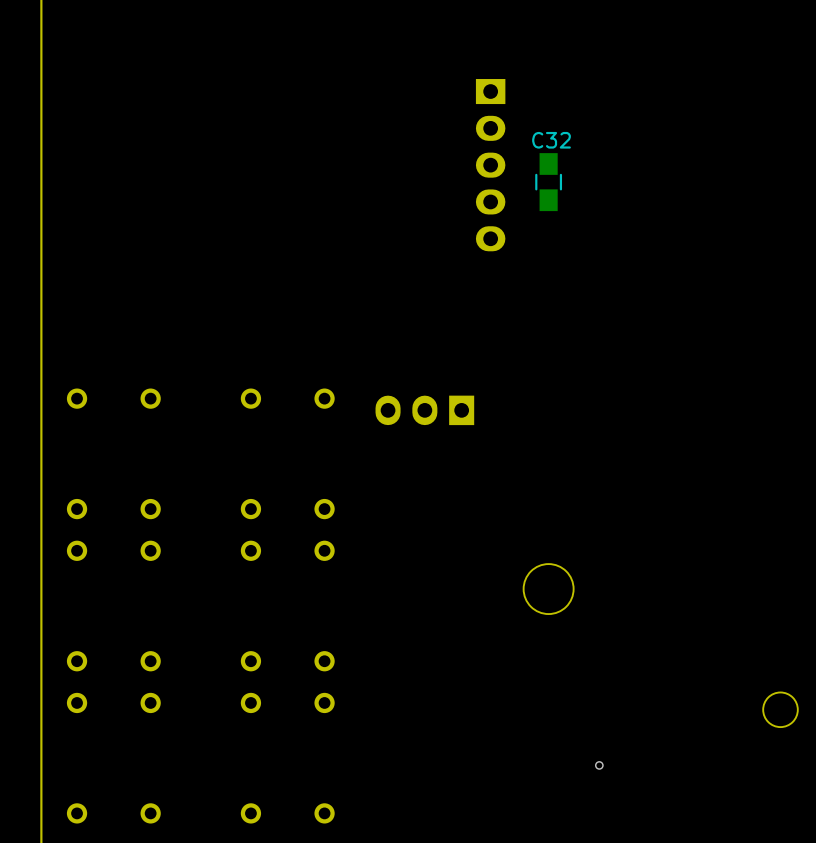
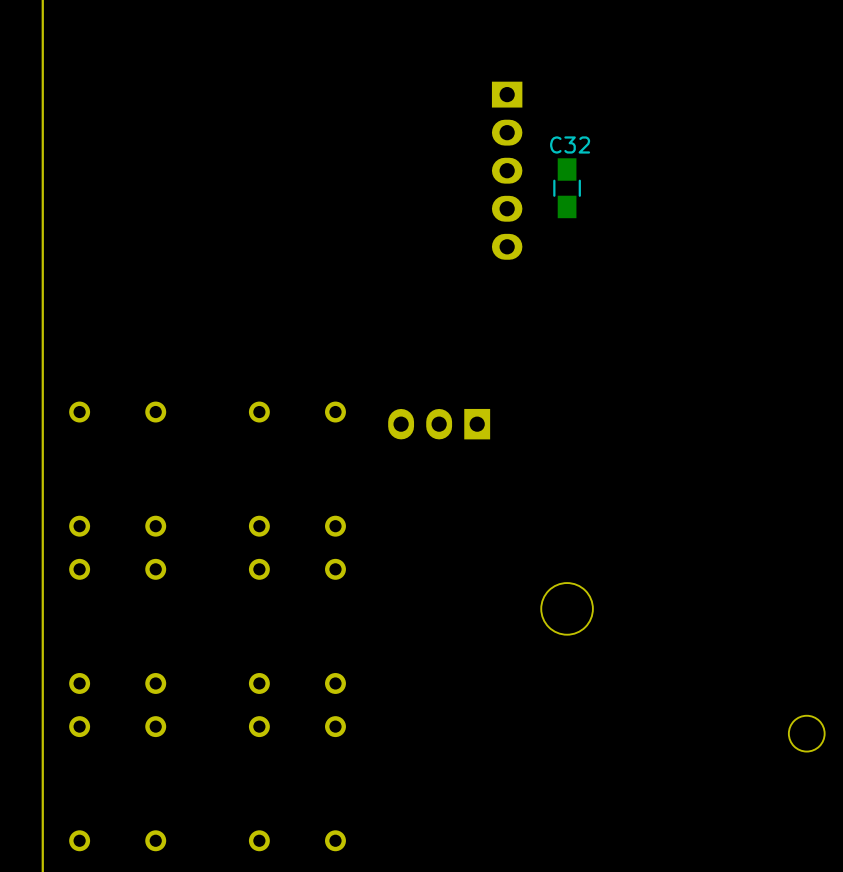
via: (599, 765) -> none

